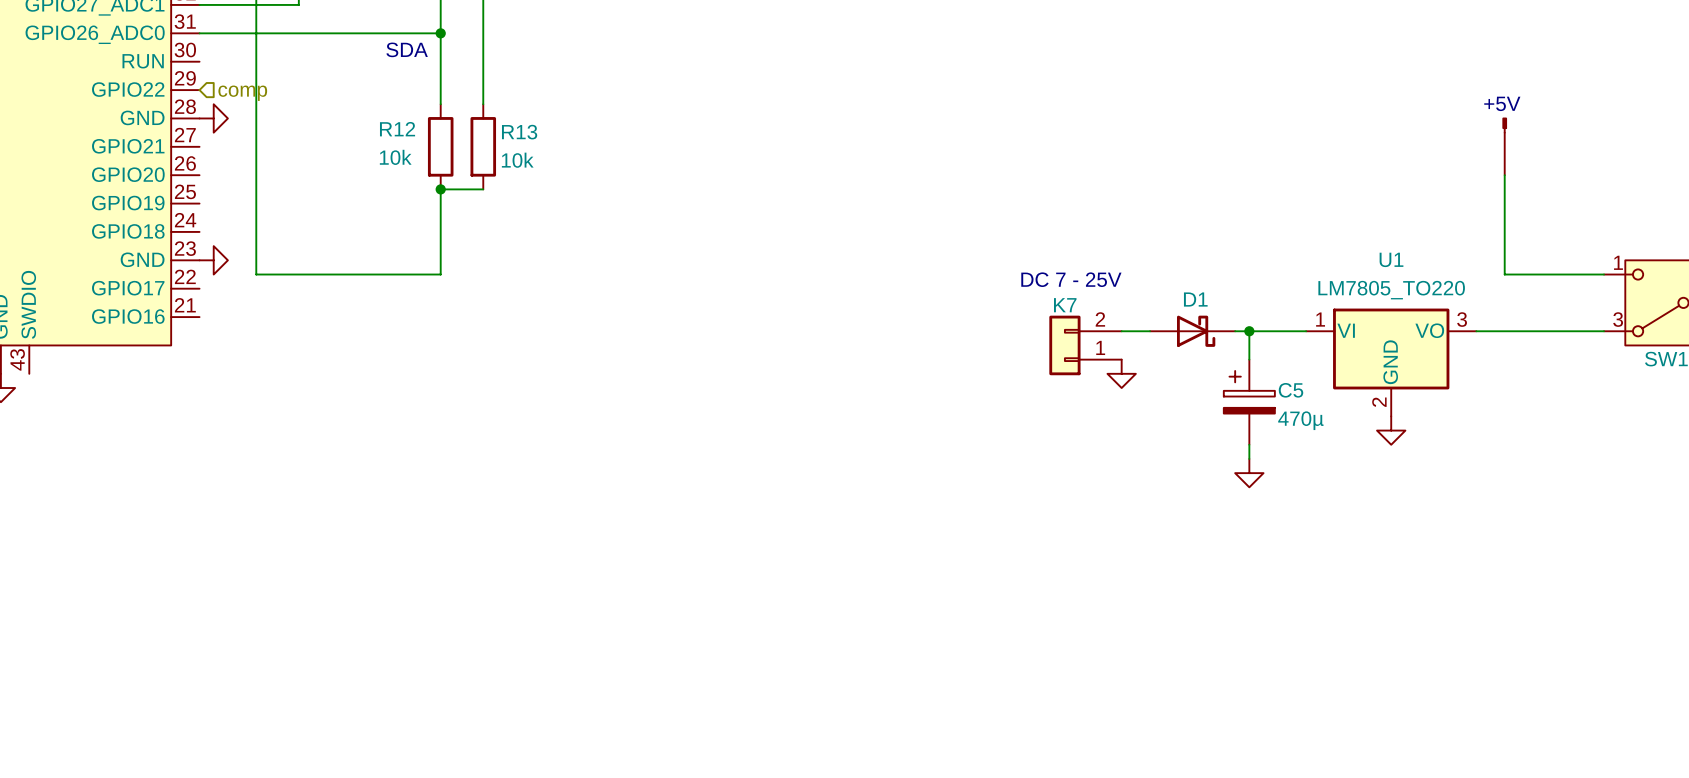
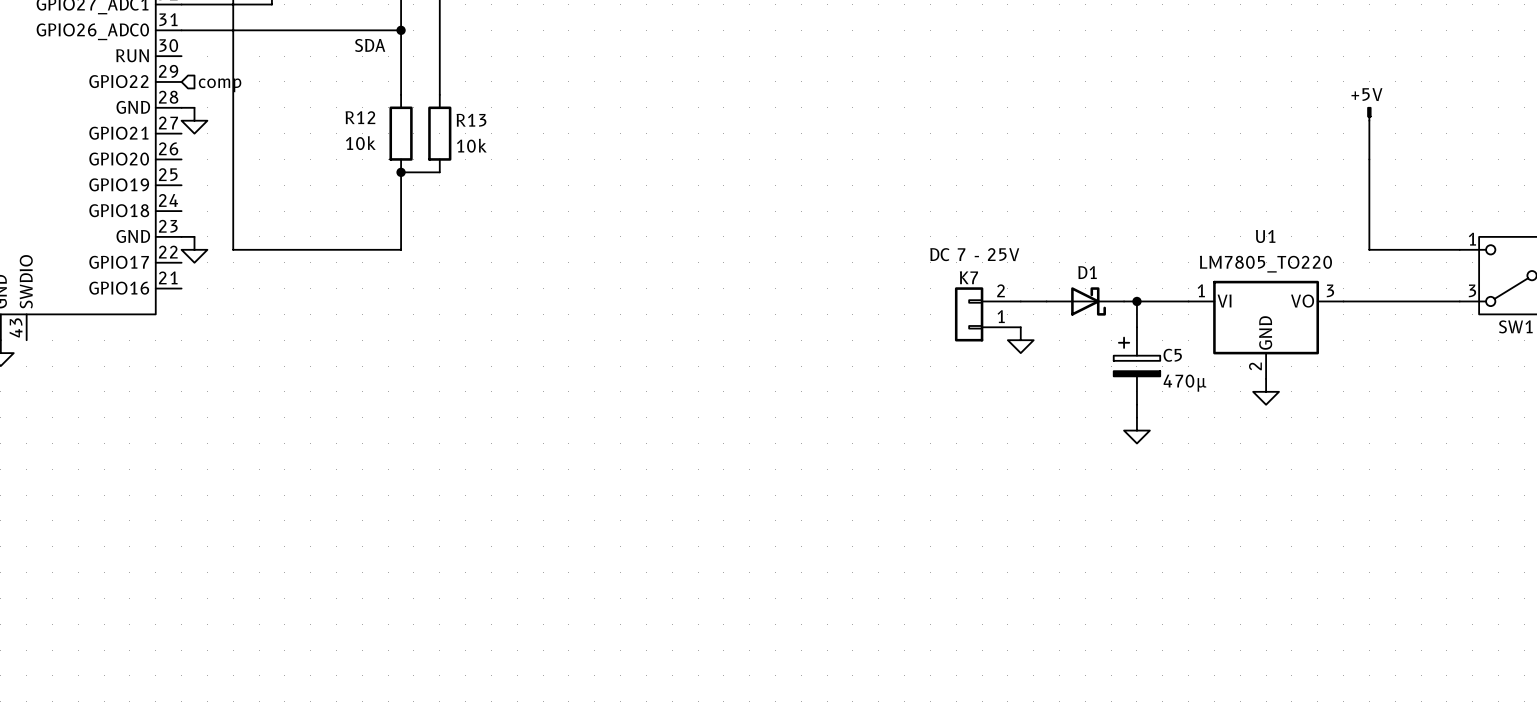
power symbol rotation: 0° (213, 118) -> 90° clockwise (194, 120)
power symbol rotation: 0° (213, 260) -> 90° clockwise (194, 249)

